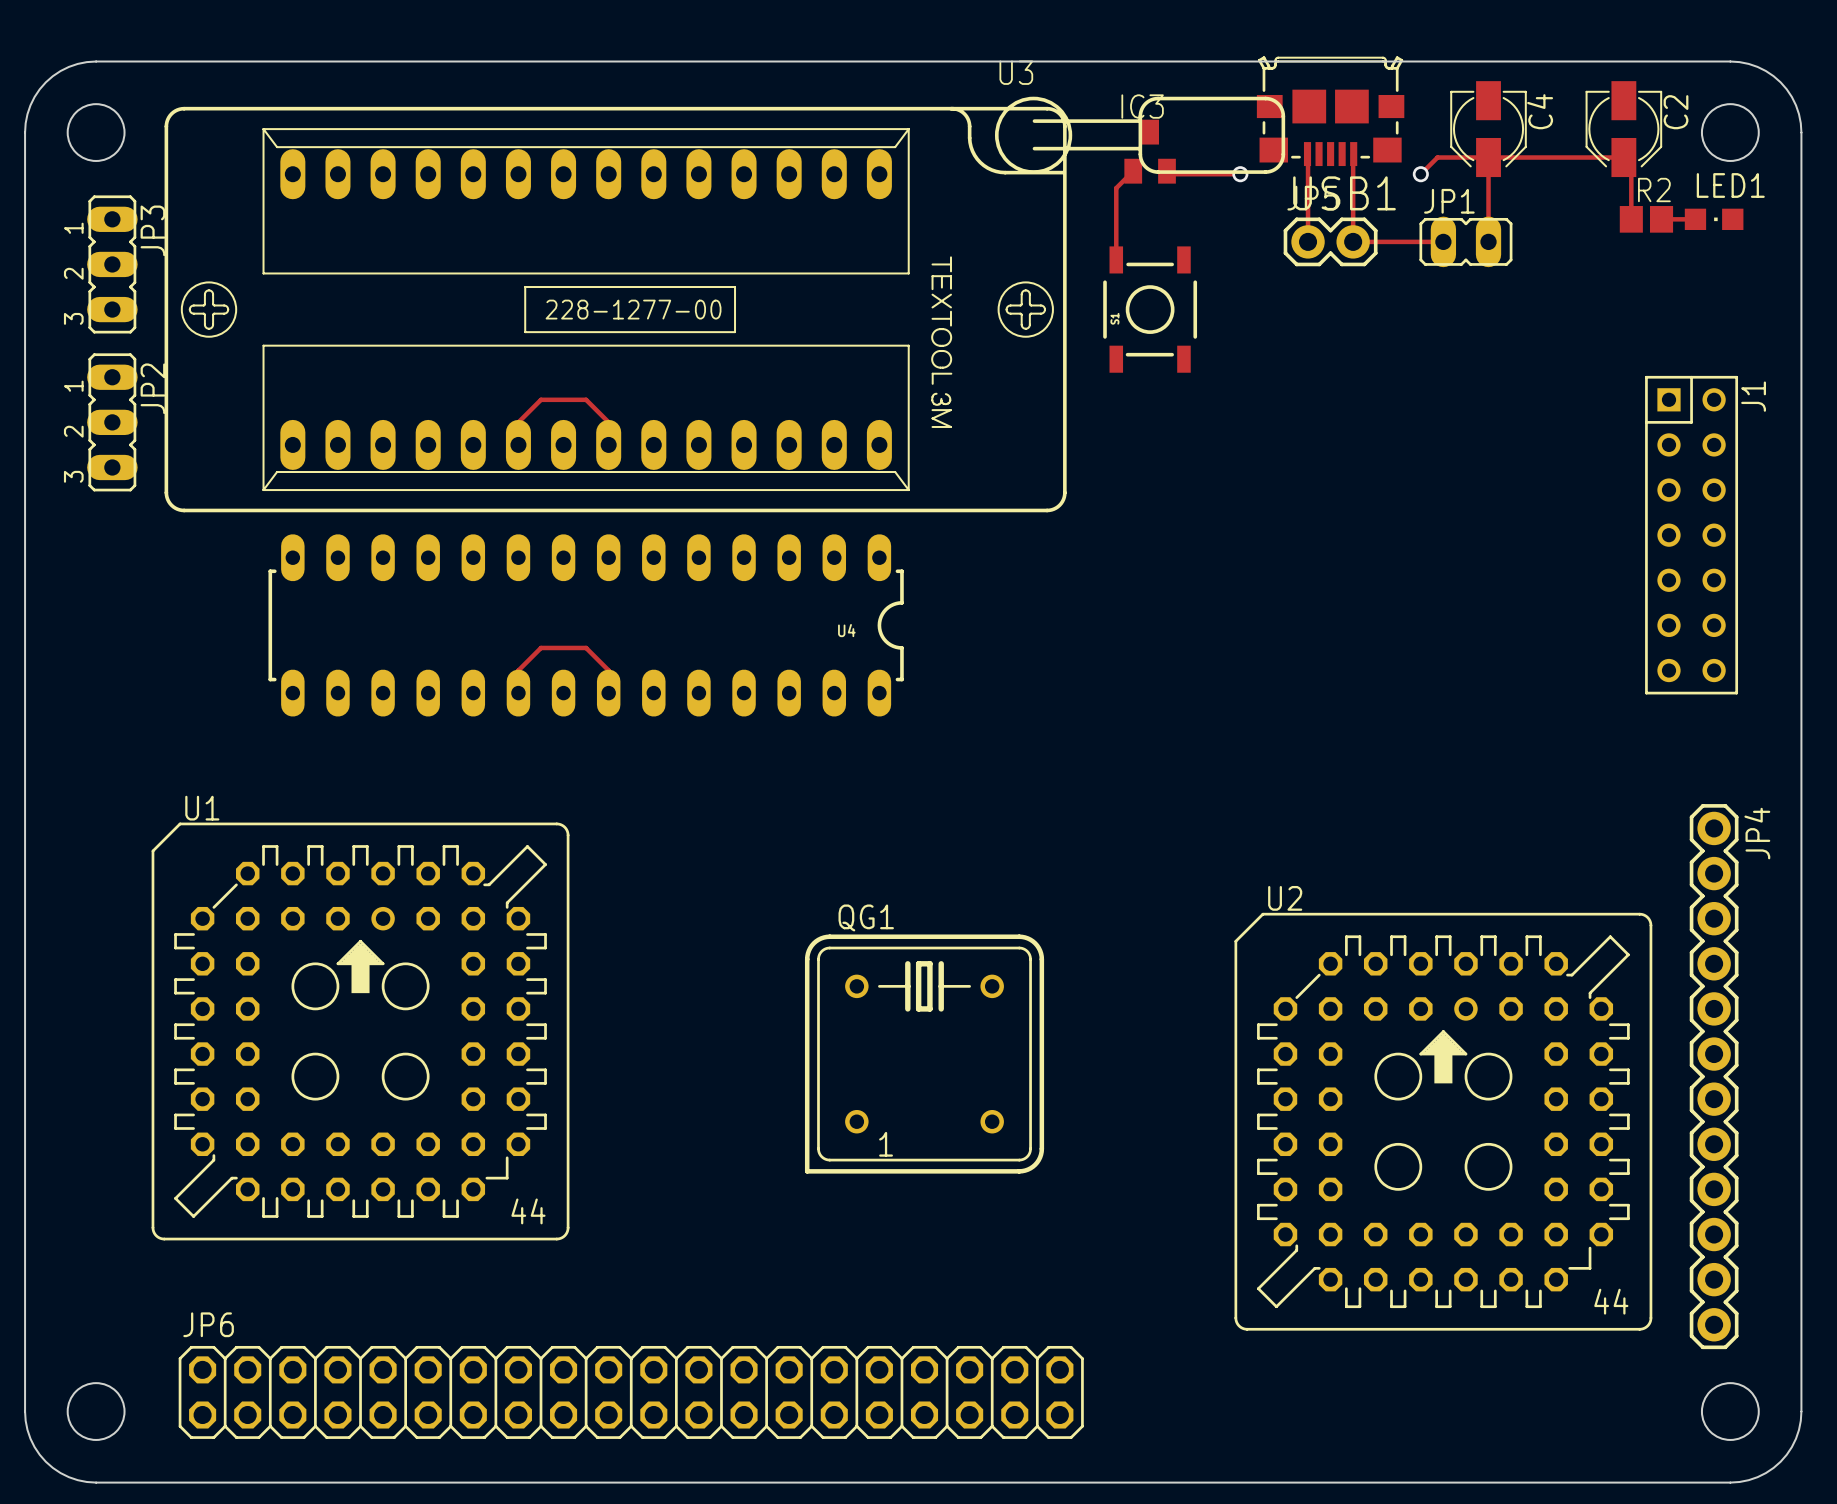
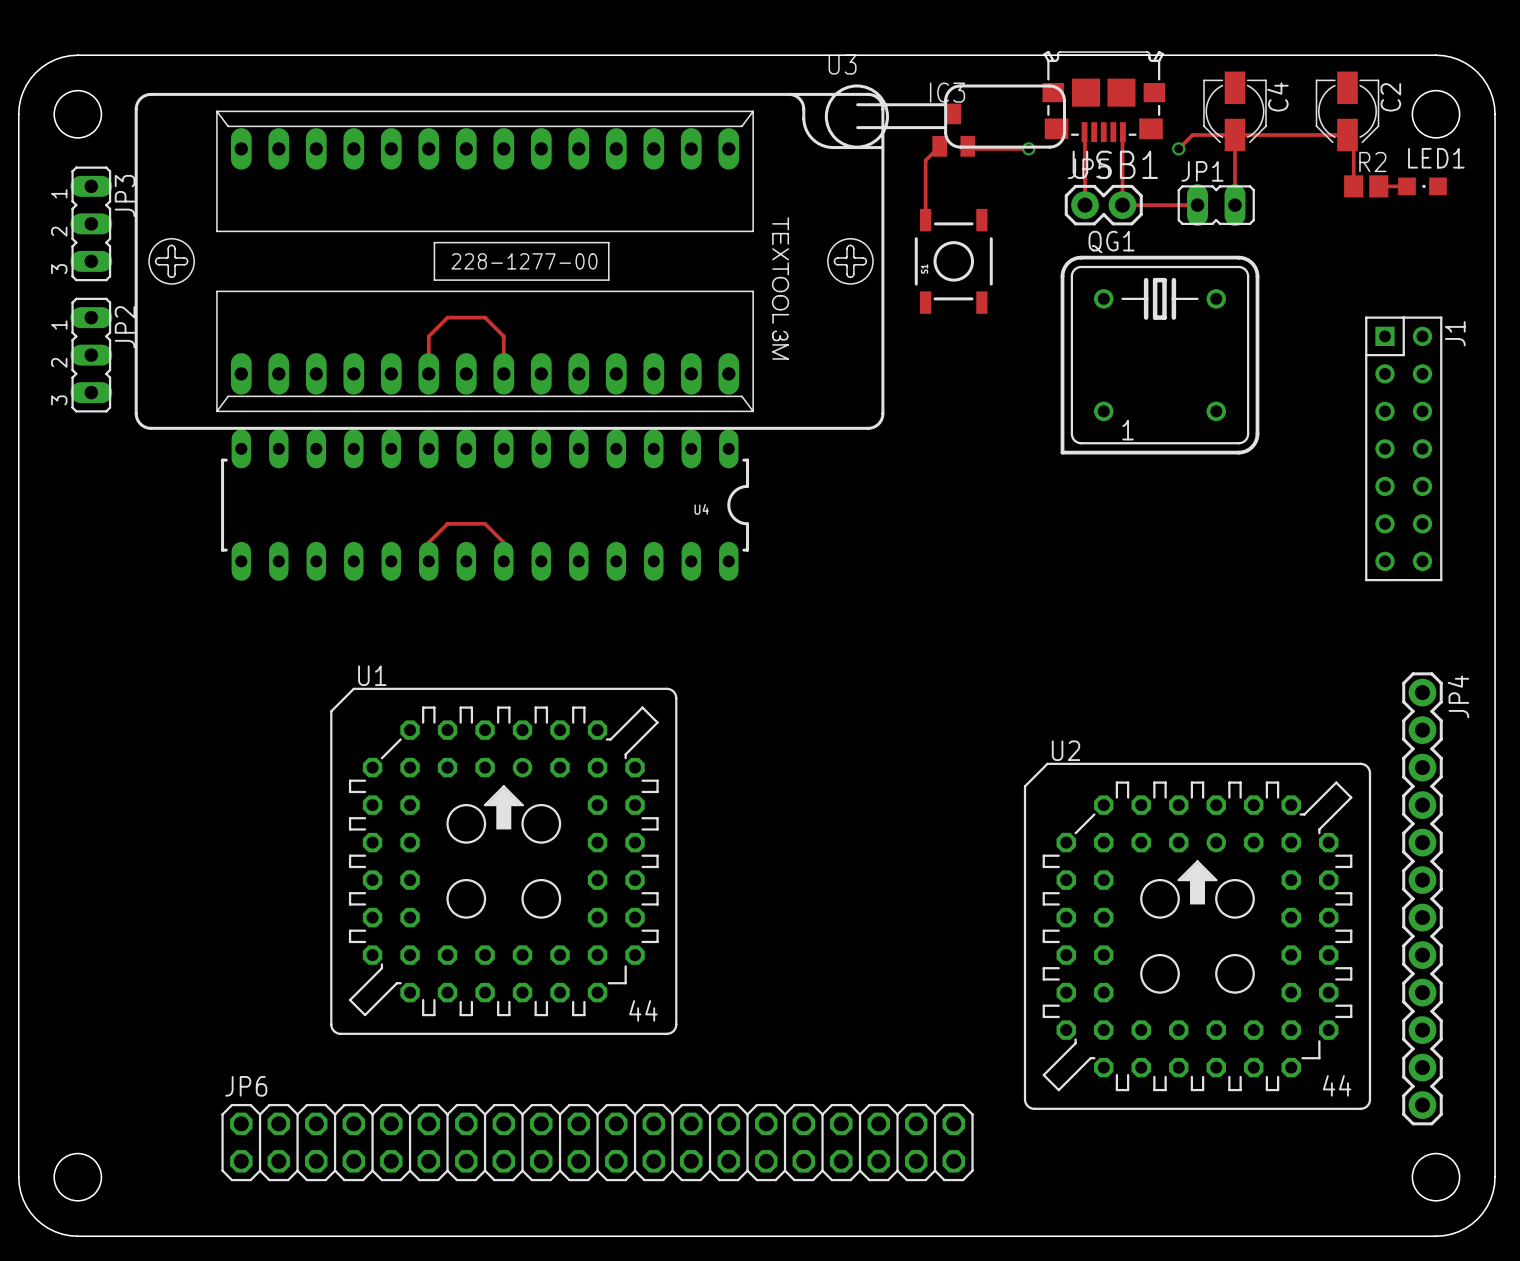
track: (518, 444) (518, 422) (541, 399) (586, 399) (608, 422) (608, 444) -> (428, 355) (428, 336) (447, 317) (485, 317) (503, 336) (503, 355)
U4 position: (586, 625) -> (485, 505)
track: (518, 693) (518, 670) (541, 647) (586, 647) (608, 670) (608, 693) -> (428, 561) (428, 542) (447, 523) (485, 523) (503, 542) (503, 561)
U1 position: (360, 1031) -> (503, 861)
QG1 position: (924, 1054) -> (1160, 355)
JP6 position: (631, 1392) -> (597, 1142)

